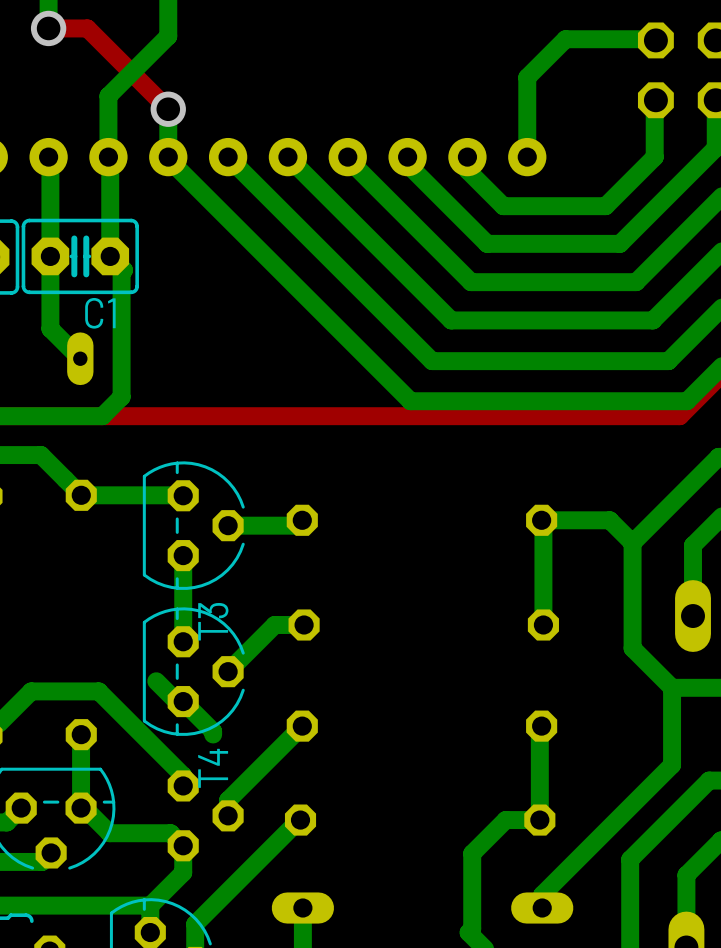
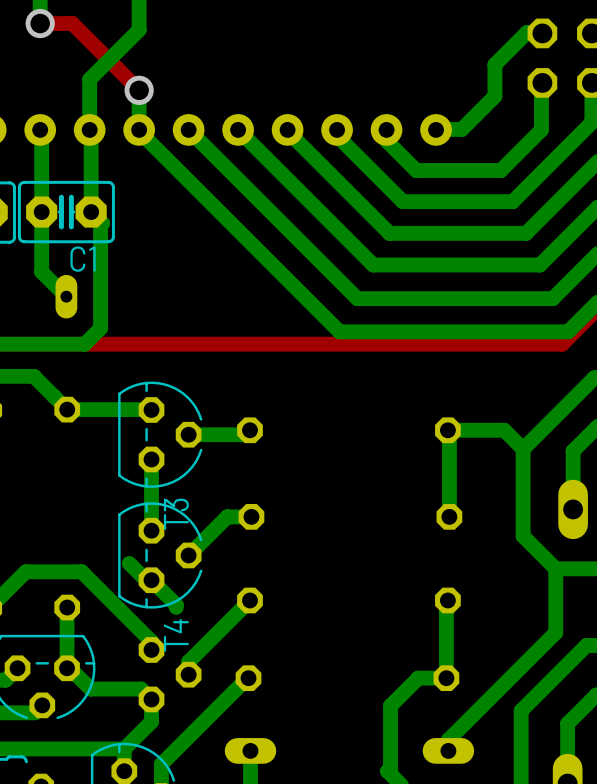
bottom track: (637, 39) (565, 39) (527, 77) (527, 157) -> (527, 32) (494, 64) (494, 96) (461, 129) (436, 129)

